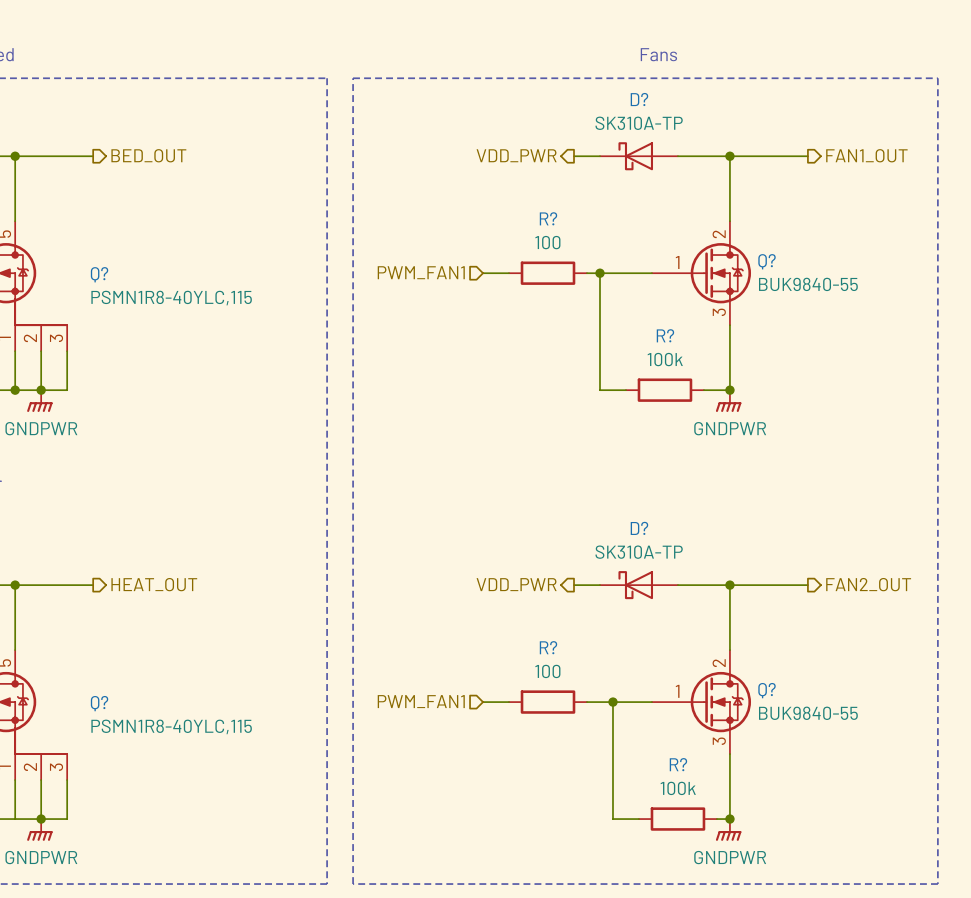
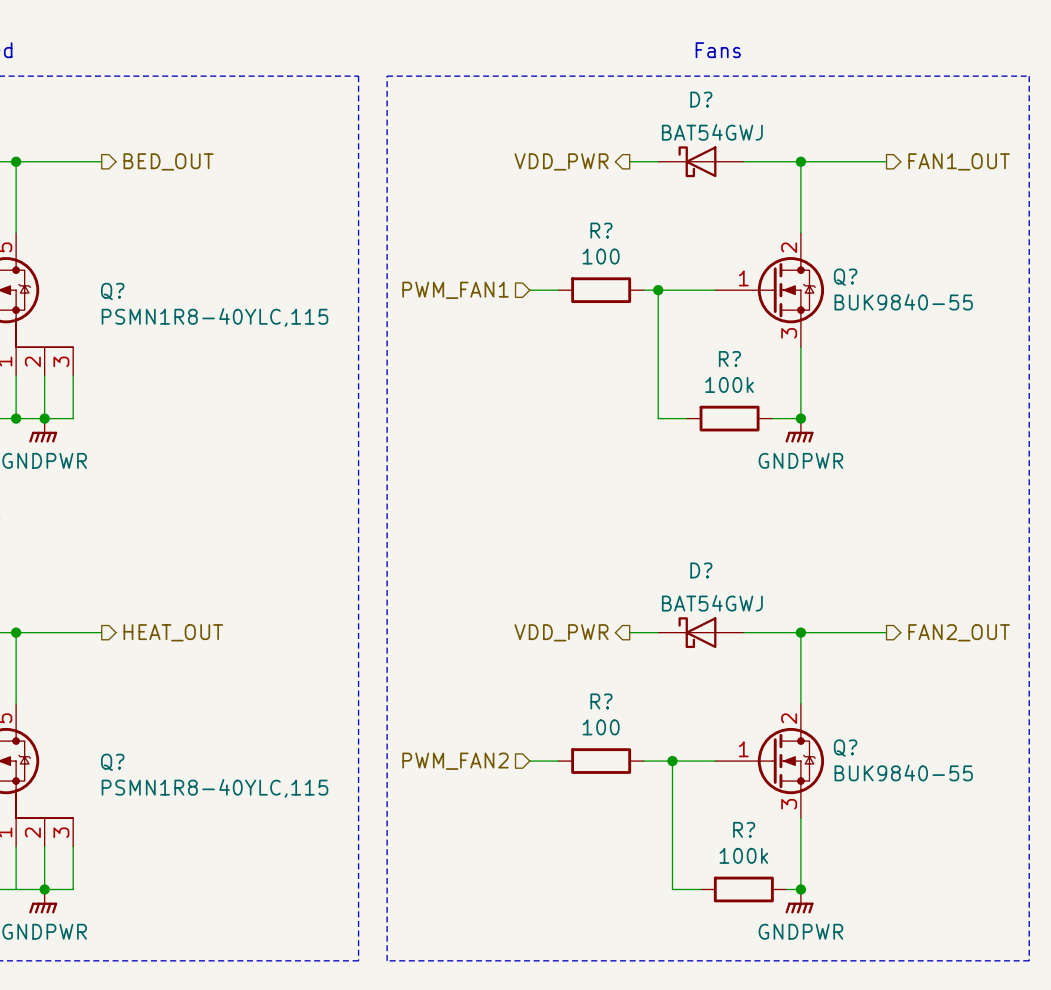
D? value: SK310A-TP (639, 123) -> BAT54GWJ (712, 132)
D? value: SK310A-TP (639, 552) -> BAT54GWJ (712, 603)
hierarchical label: PWM_FAN1 (421, 701) -> PWM_FAN2 (455, 761)

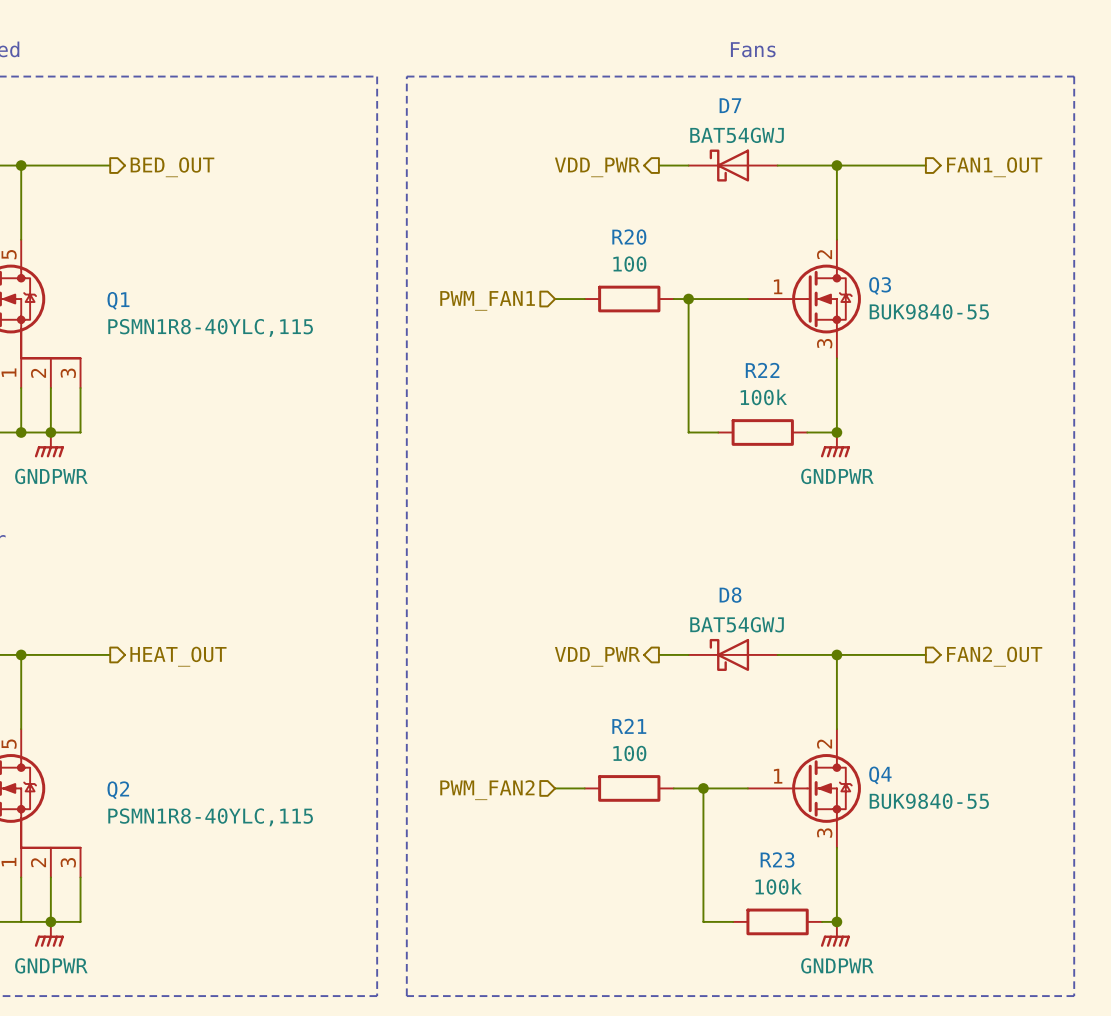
D? name: D? (701, 99) -> D7 (730, 105)
R? name: R? (601, 230) -> R20 (629, 237)
Q? name: Q? (845, 277) -> Q3 (880, 286)
Q? name: Q? (112, 291) -> Q1 (118, 300)
R? name: R? (729, 358) -> R22 (762, 370)
D? name: D? (701, 570) -> D8 (730, 595)
R? name: R? (601, 701) -> R21 (629, 726)
Q? name: Q? (845, 748) -> Q4 (880, 775)
Q? name: Q? (112, 762) -> Q2 (118, 790)
R? name: R? (744, 829) -> R23 (777, 859)

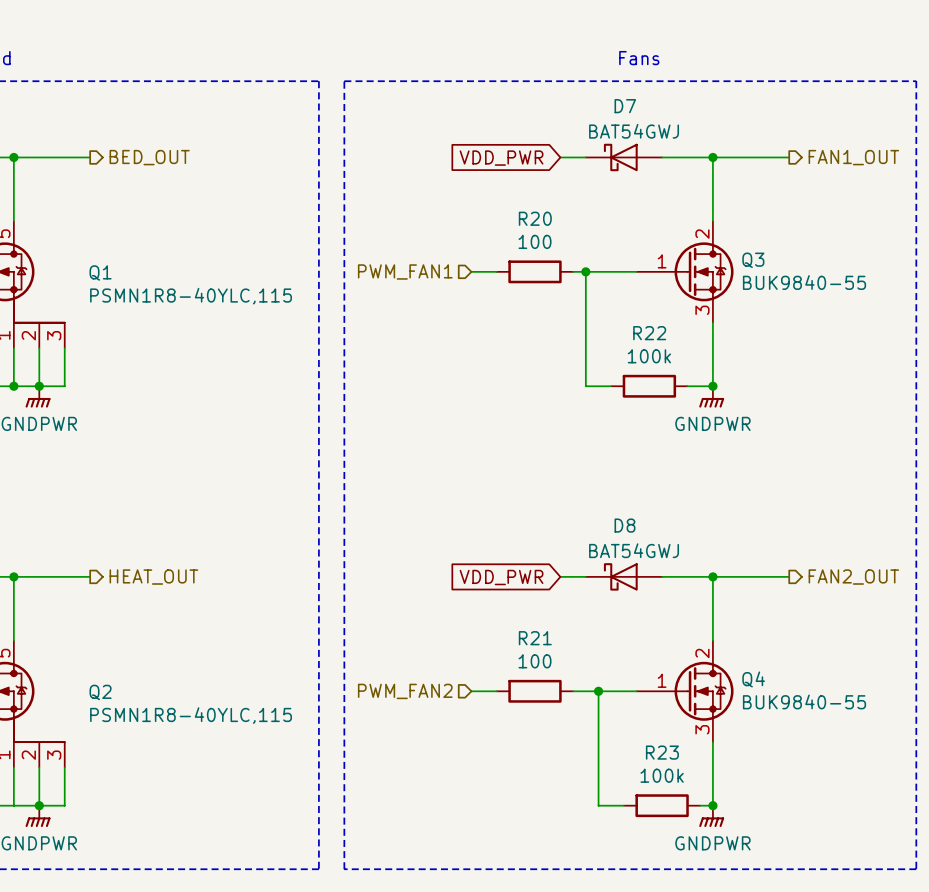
hierarchical label: VDD_PWR (597, 167) -> none
global label: none -> VDD_PWR (501, 158)
hierarchical label: VDD_PWR (597, 656) -> none
global label: none -> VDD_PWR (501, 577)

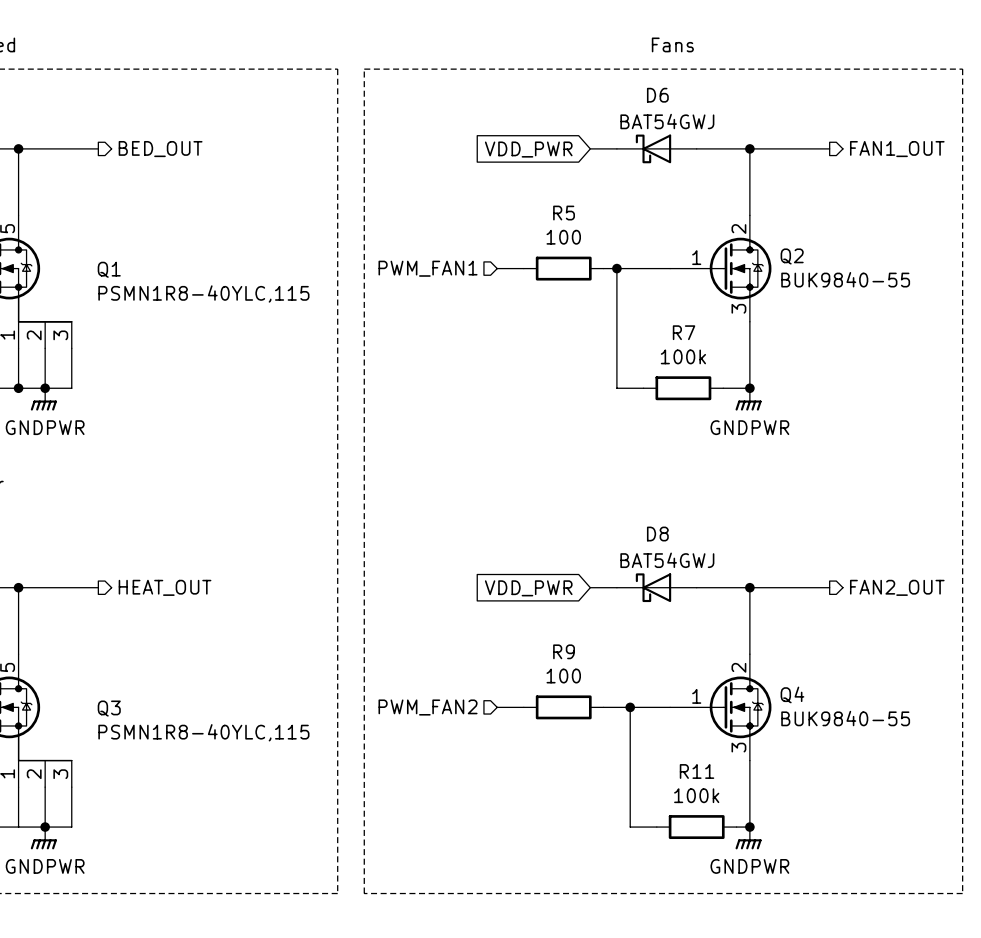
D7 name: D7 (625, 106) -> D6 (657, 95)
R20 name: R20 (535, 218) -> R5 (564, 213)
Q3 name: Q3 (753, 260) -> Q2 (792, 256)
R22 name: R22 (649, 333) -> R7 (684, 332)
R21 name: R21 (535, 638) -> R9 (564, 651)
Q2 name: Q2 (100, 692) -> Q3 (109, 708)
R23 name: R23 (662, 752) -> R11 (697, 771)

